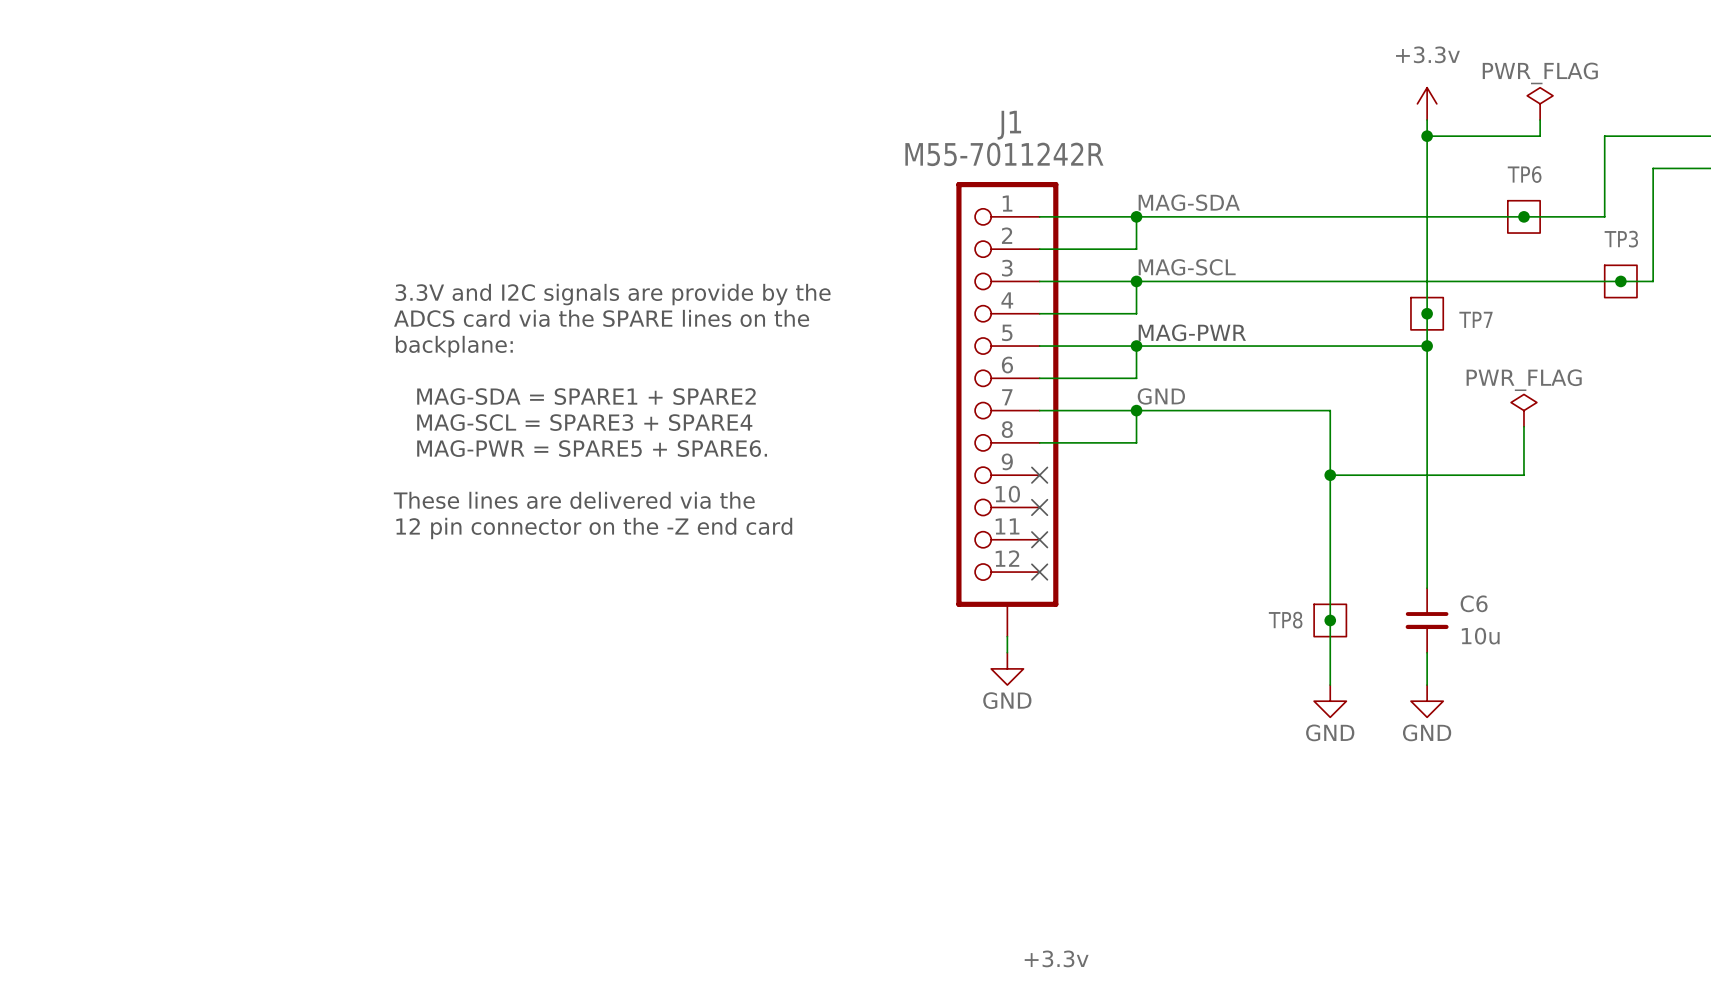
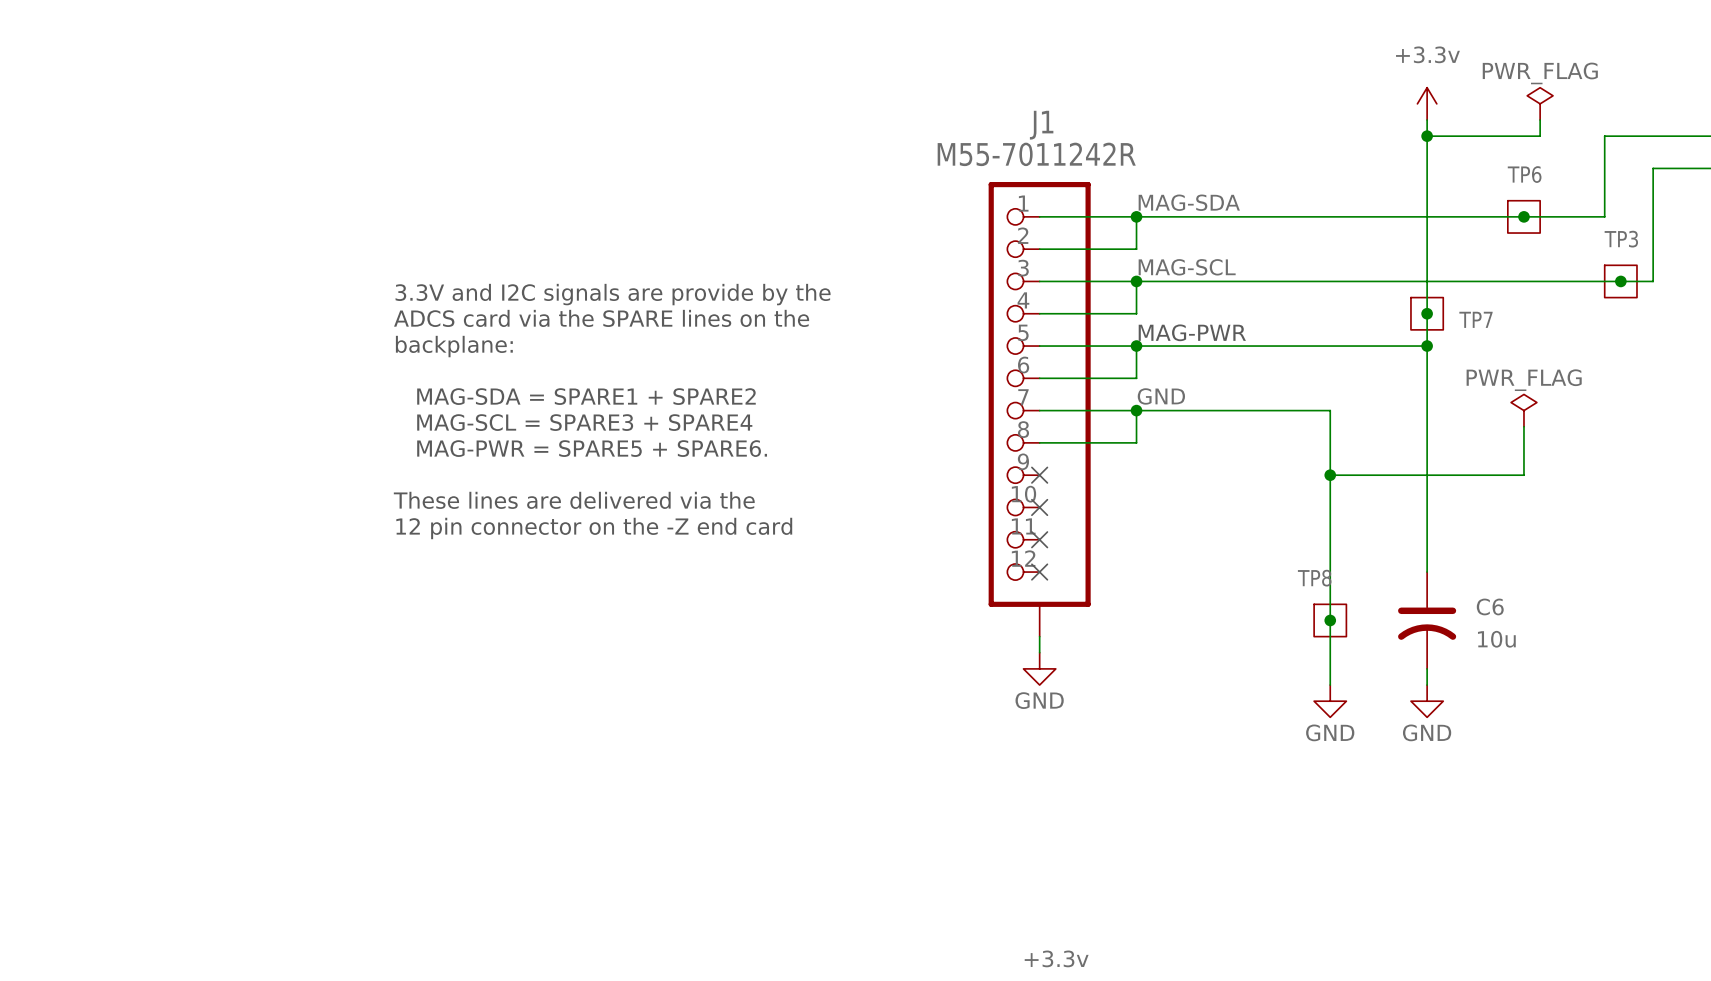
J1 symbol: [956, 182, 1059, 637] -> [988, 182, 1091, 637]
C6 symbol: [1405, 588, 1449, 653] -> [1398, 572, 1457, 669]
TP8 name position: TP8 (1285, 620) -> TP8 (1314, 578)
wire: (1007, 636) (1007, 652) -> (1039, 636) (1039, 652)
power symbol position: GND (1007, 668) -> GND (1039, 668)

